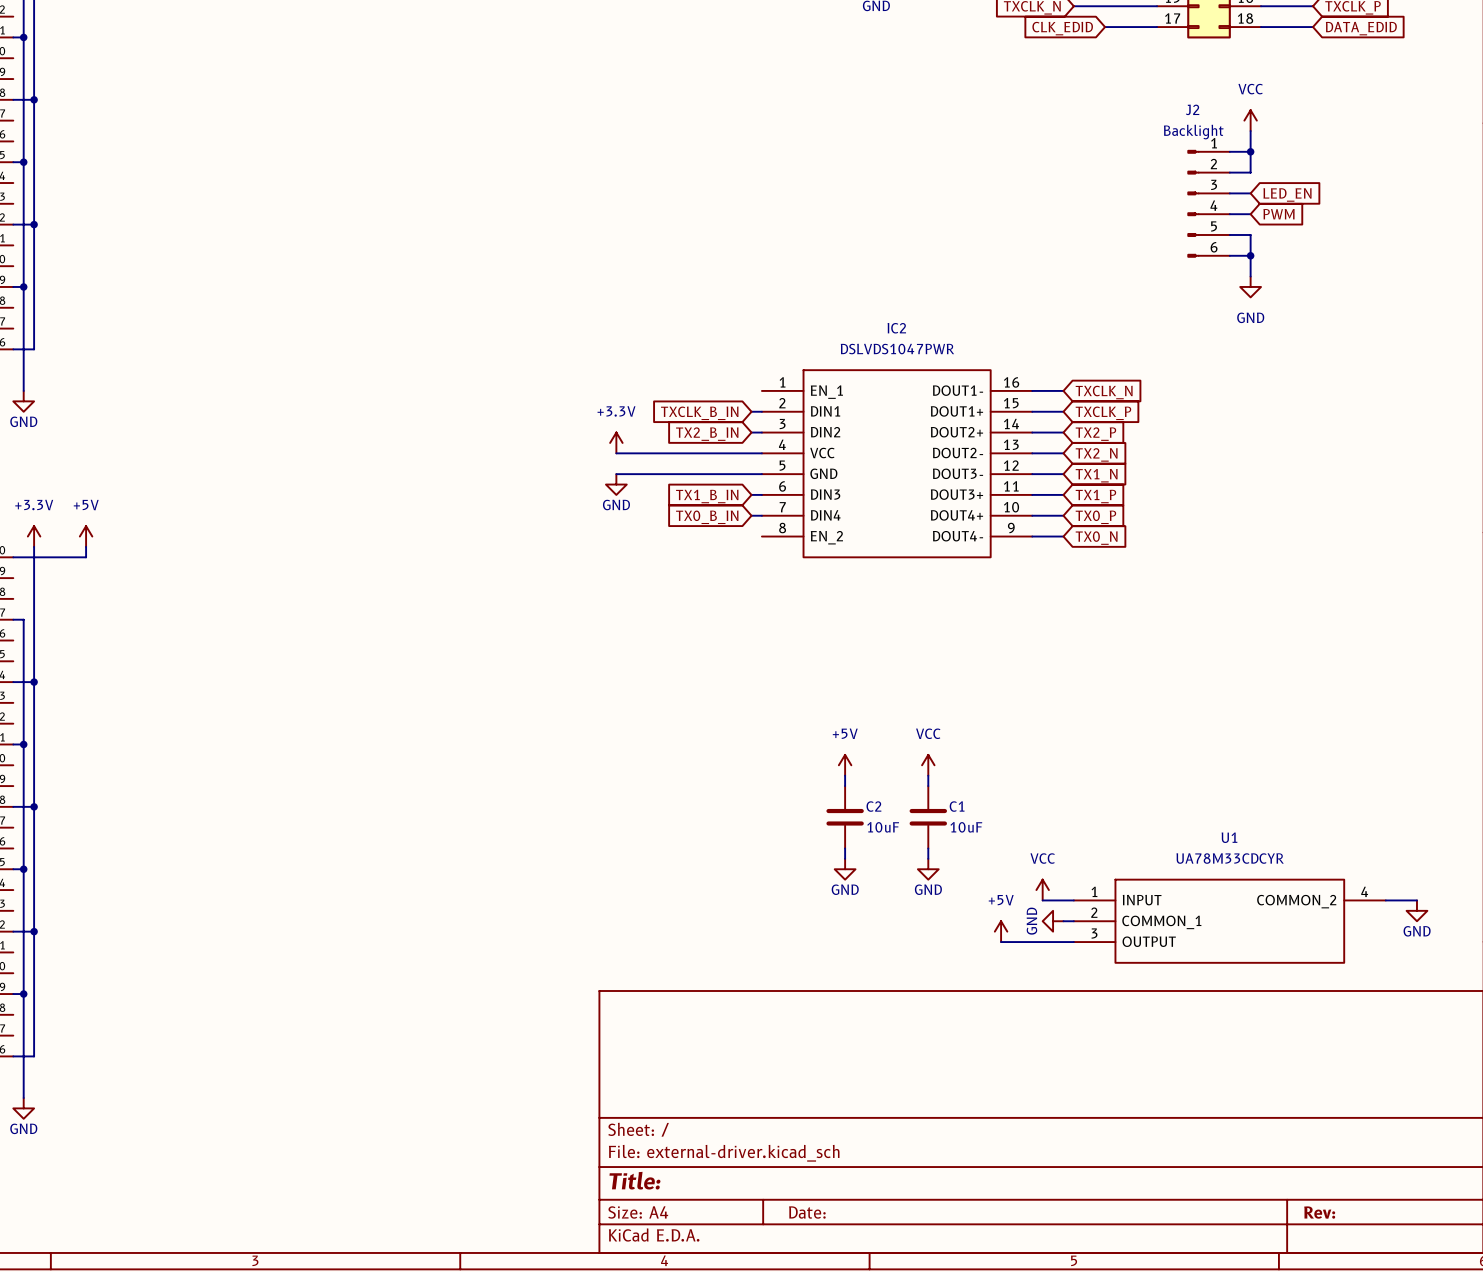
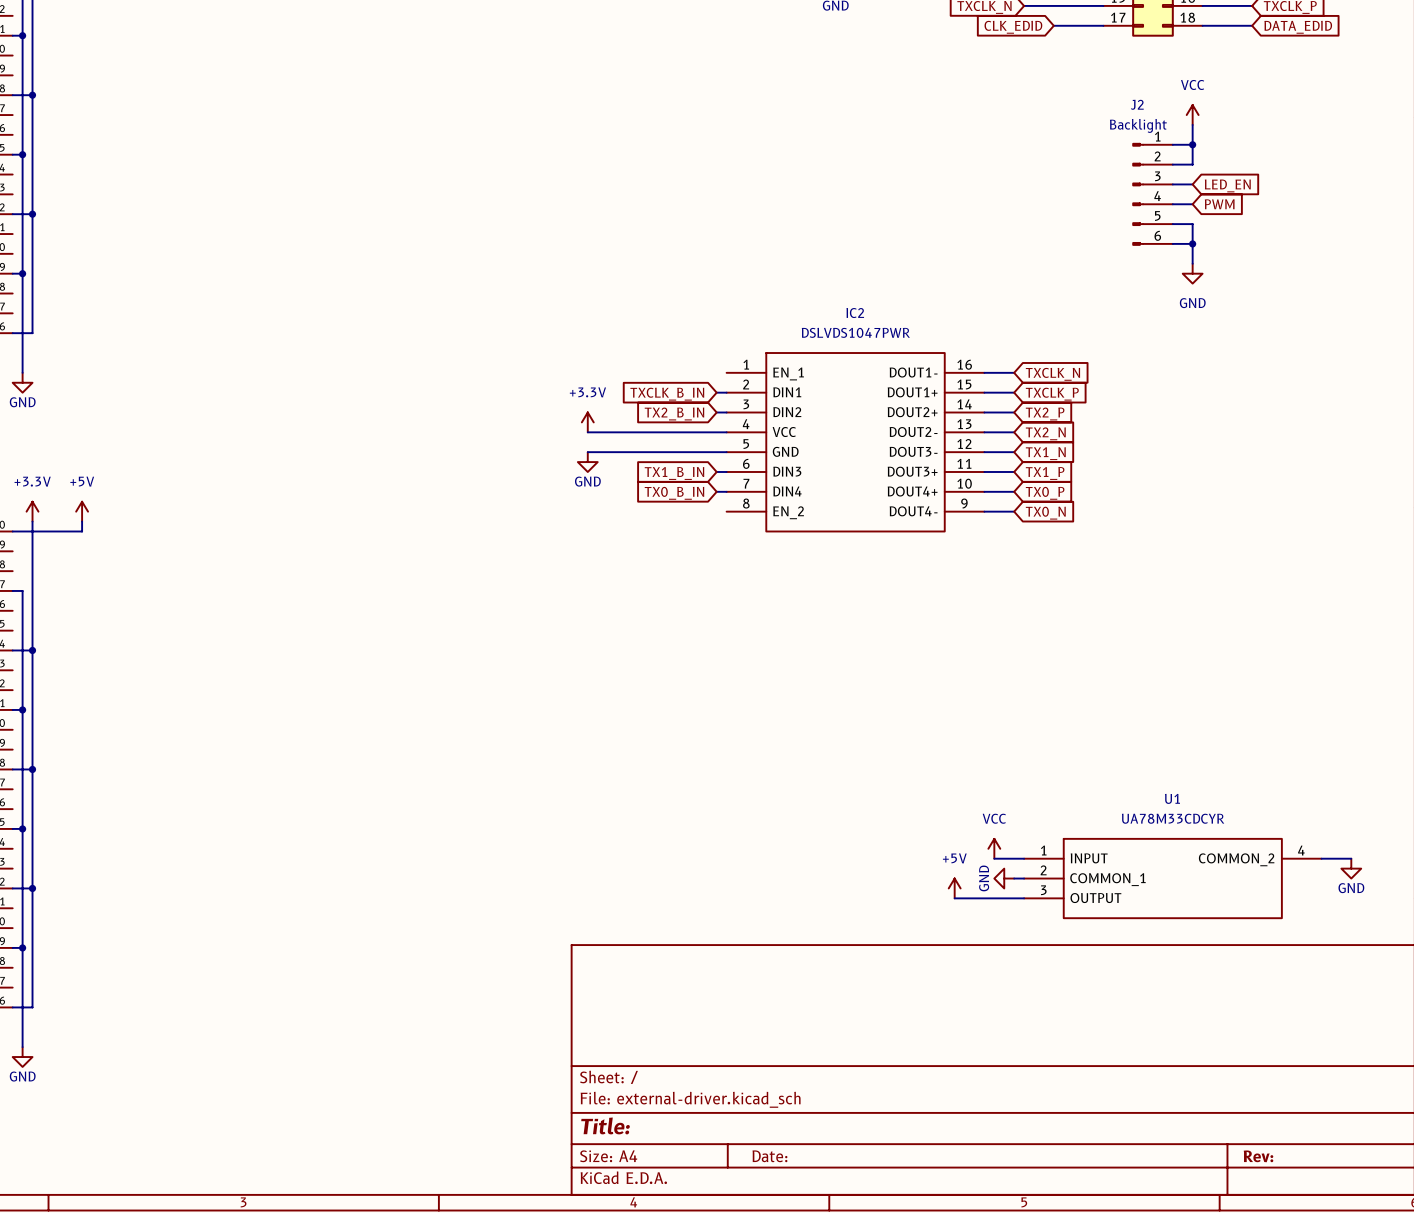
power symbol: +5V (845, 765) -> none
power symbol: VCC (928, 765) -> none
wire: (845, 775) (845, 786) -> none
wire: (928, 775) (928, 786) -> none
C2: 10uF (845, 817) -> none
C1: 10uF (928, 817) -> none
wire: (845, 848) (845, 858) -> none
wire: (928, 848) (928, 858) -> none
power symbol: GND (845, 869) -> none
power symbol: GND (928, 869) -> none

